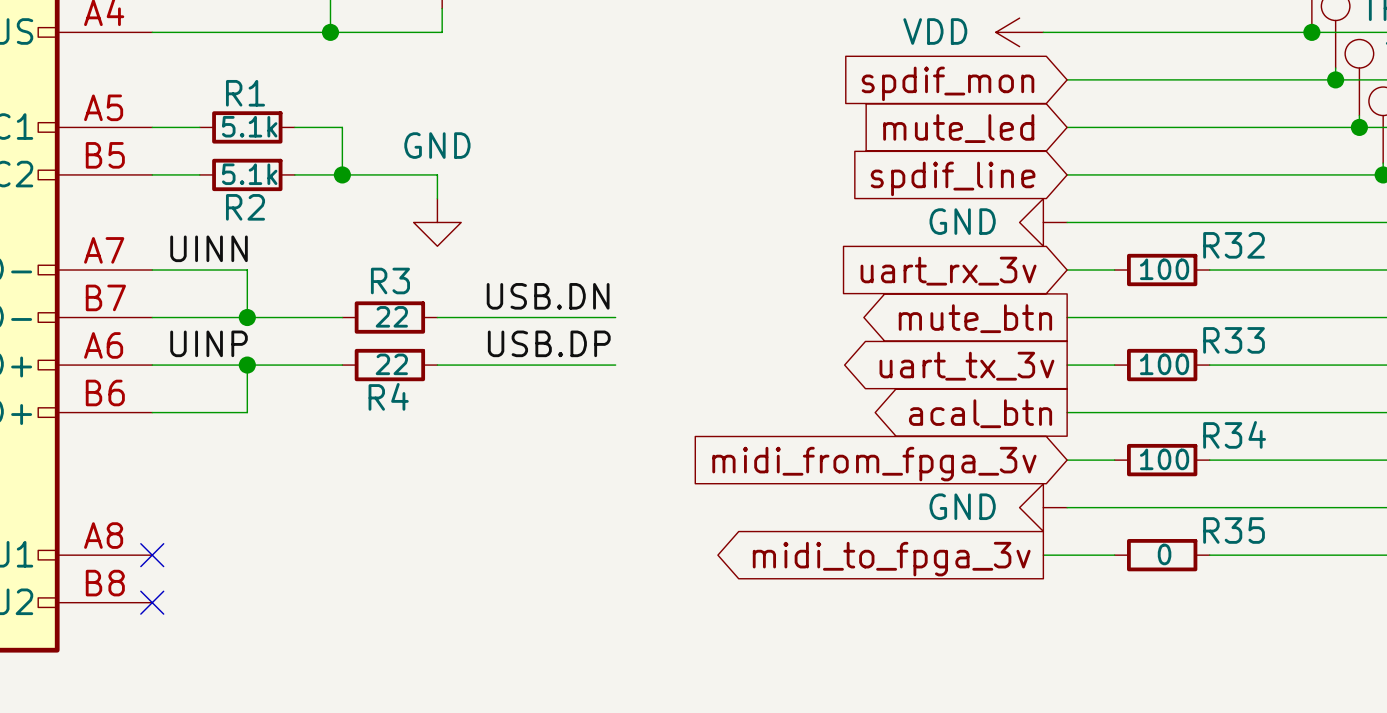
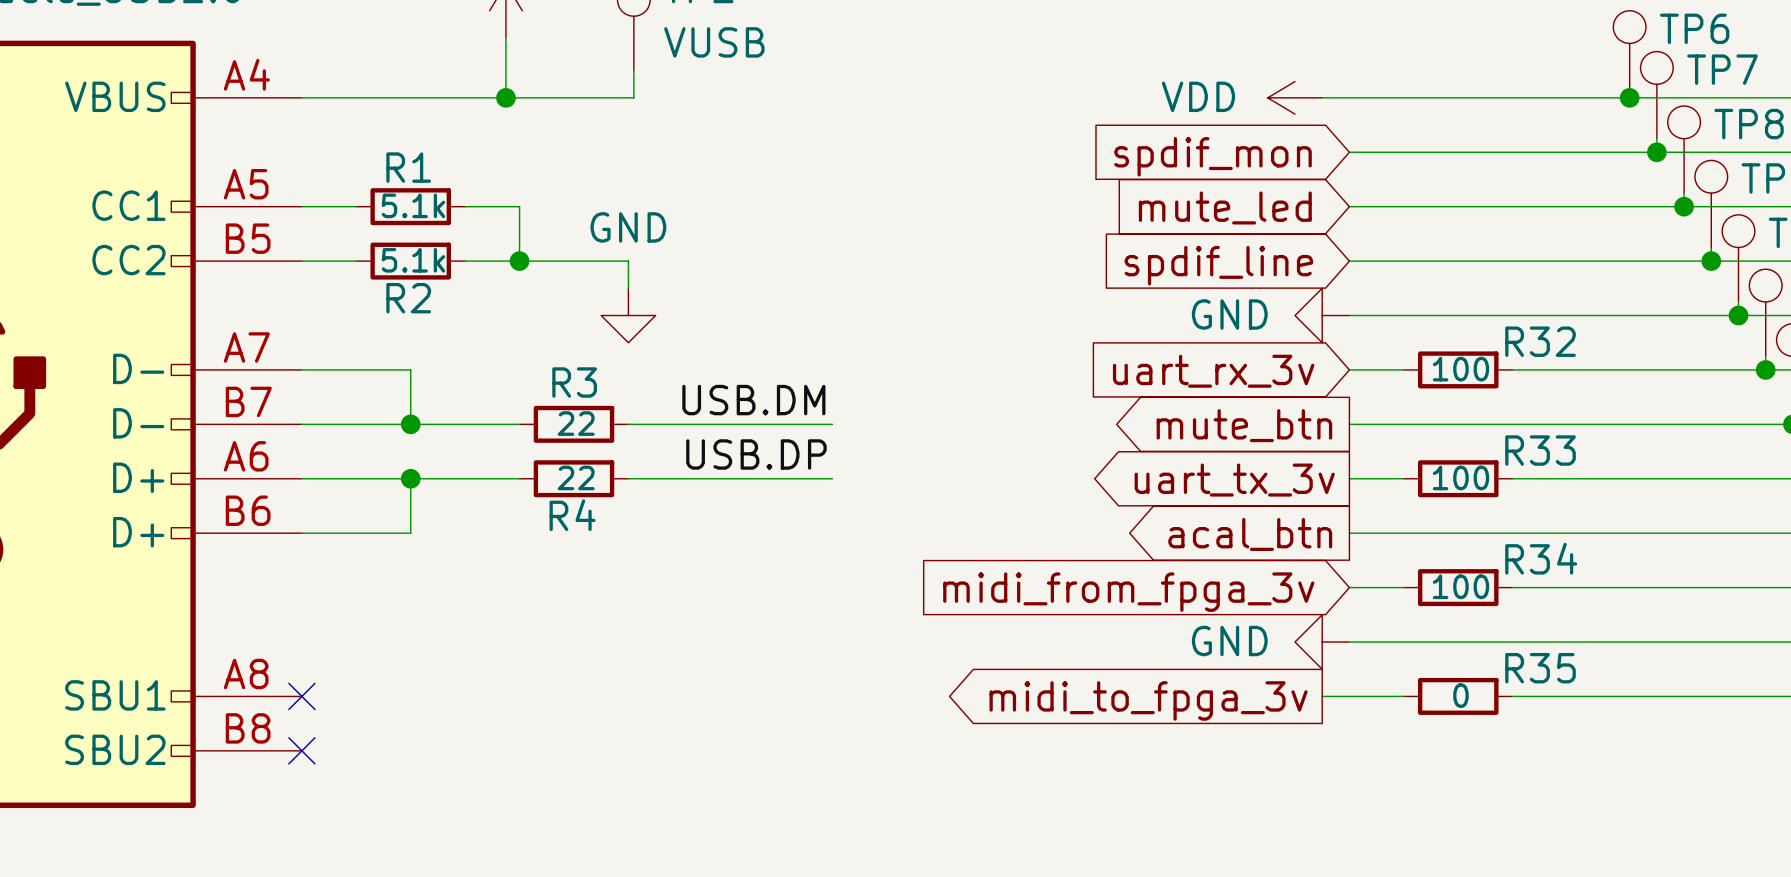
label: UINN (209, 248) -> none
label: USB.DN (548, 296) -> USB.DM (753, 400)
label: UINP (209, 343) -> none

